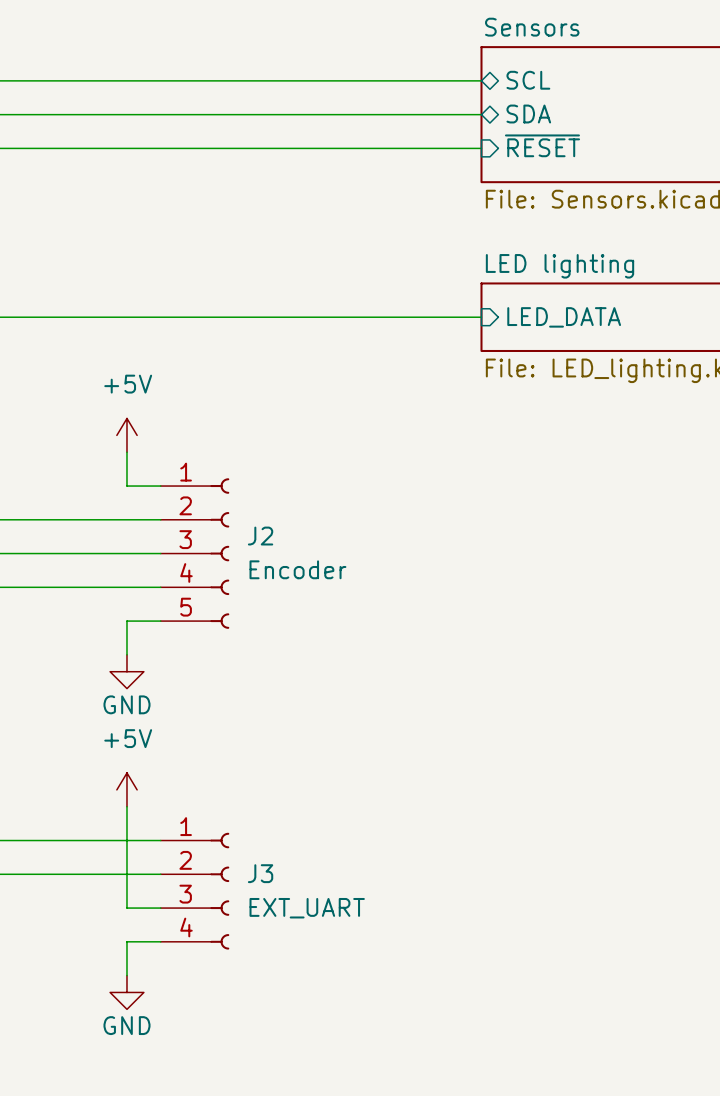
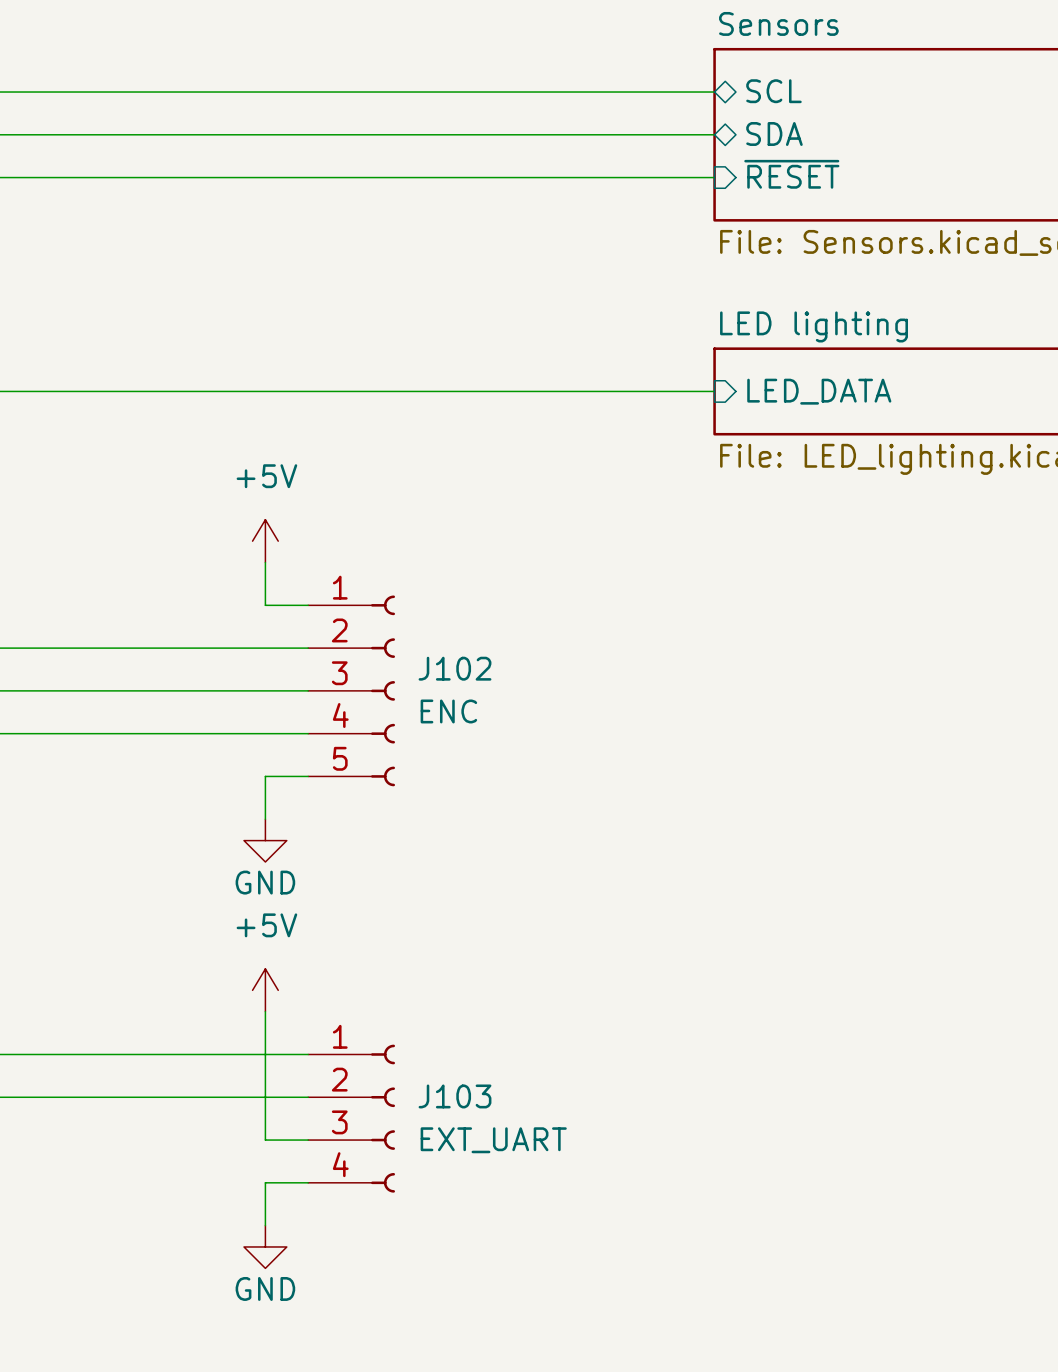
J2 name: J2 (260, 536) -> J102 (455, 668)
J2 value: Encoder (297, 569) -> ENC (448, 711)
J3 name: J3 (260, 873) -> J103 (455, 1096)

